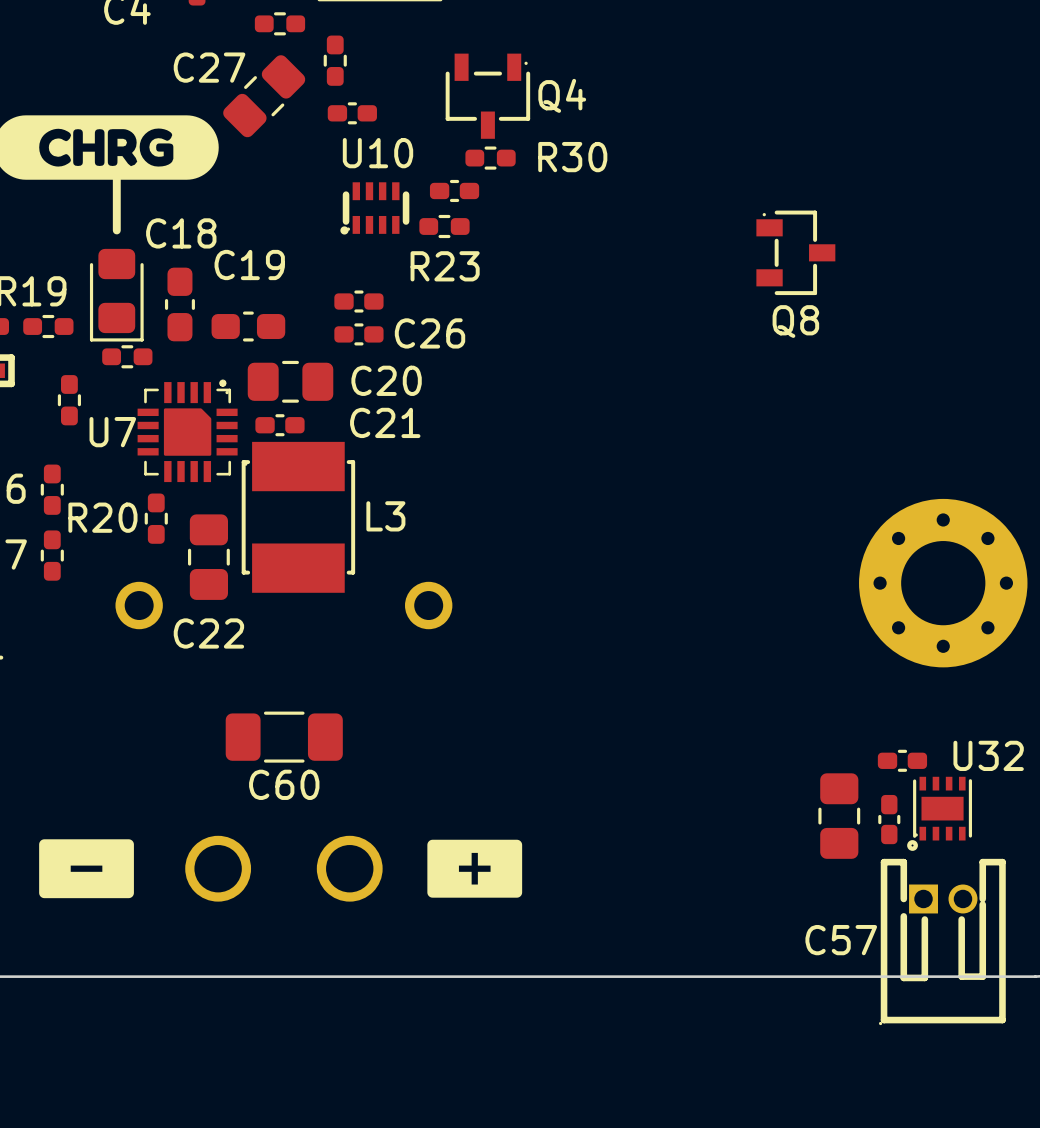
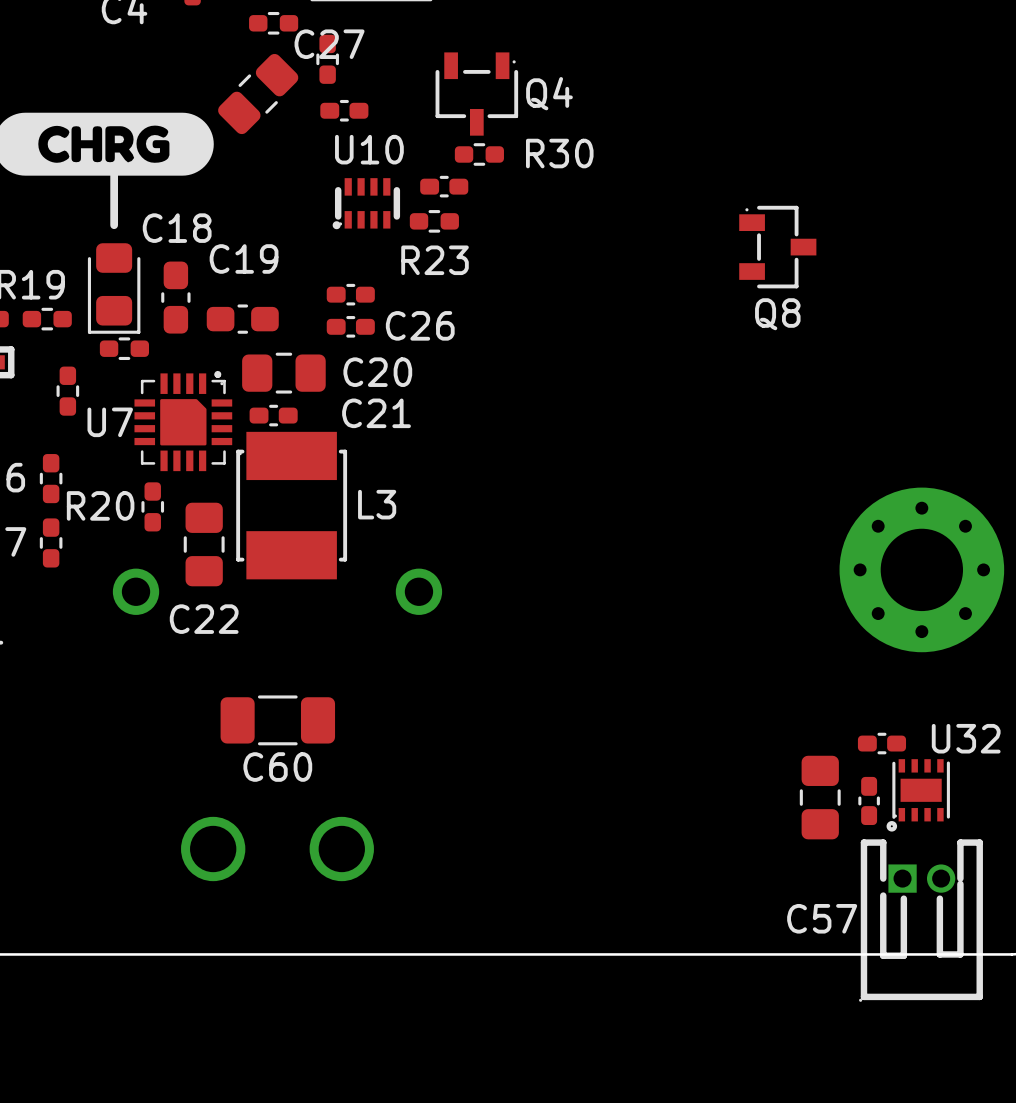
C27 name position: C27 (209, 67) -> C27 (329, 44)
drawing: [39, 839, 134, 899] -> none
drawing: [427, 839, 523, 898] -> none

